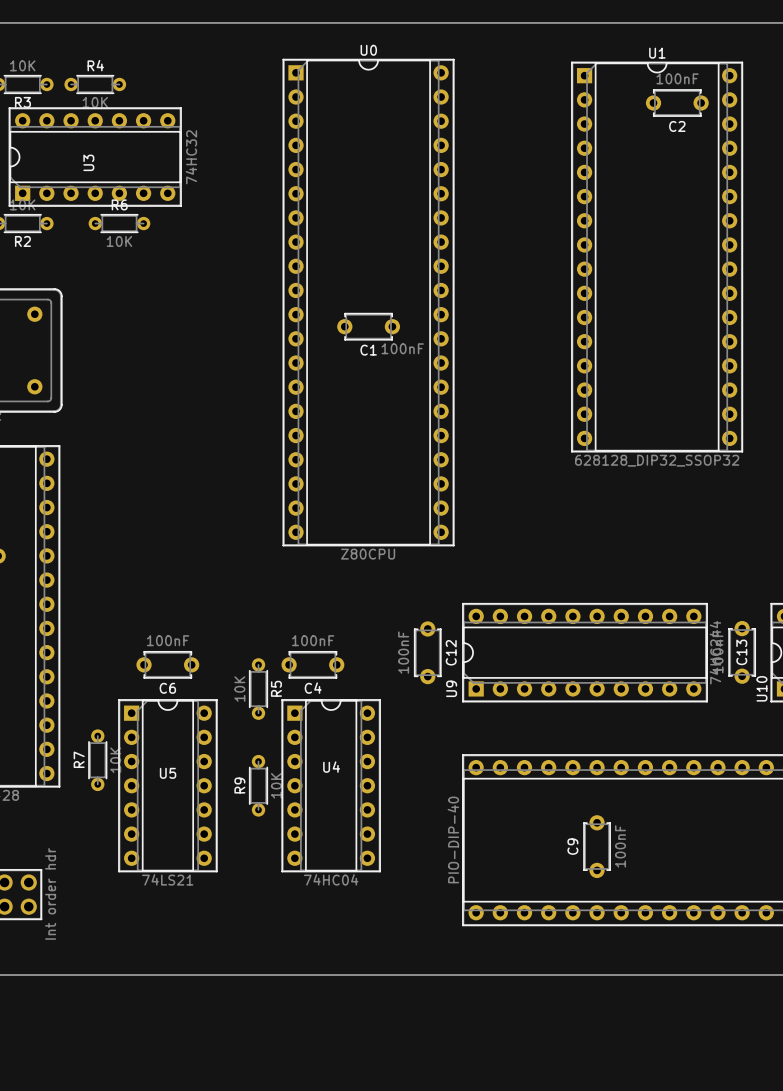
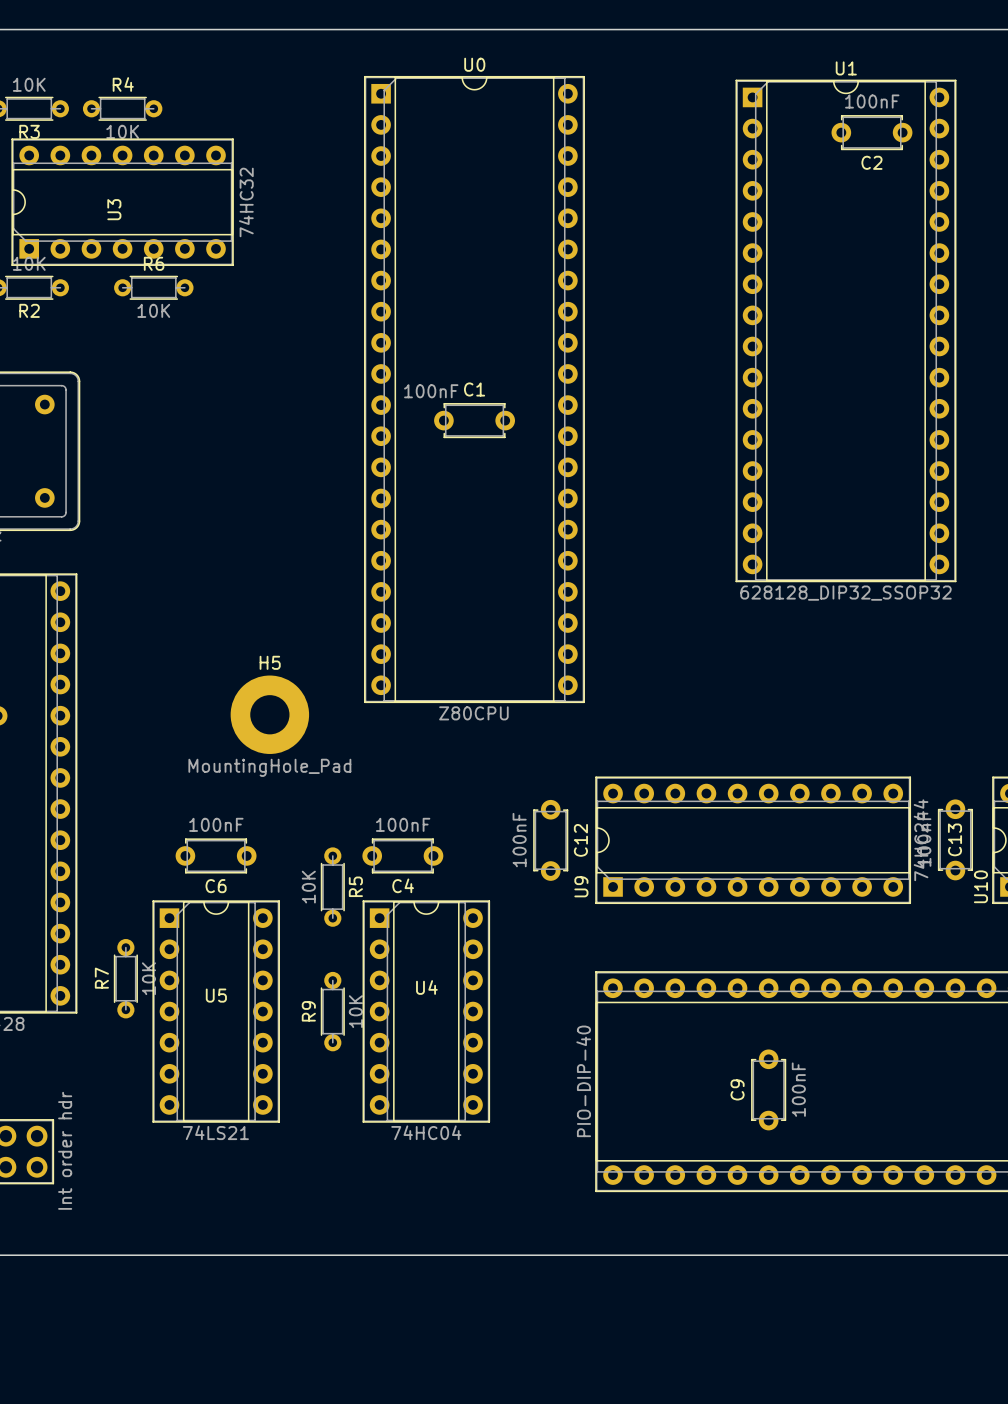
C1 value position: 100nF (402, 348) -> 100nF (431, 391)
C1 name position: C1 (368, 350) -> C1 (474, 389)
H5: none -> MountingHole_Pad (269, 714)

